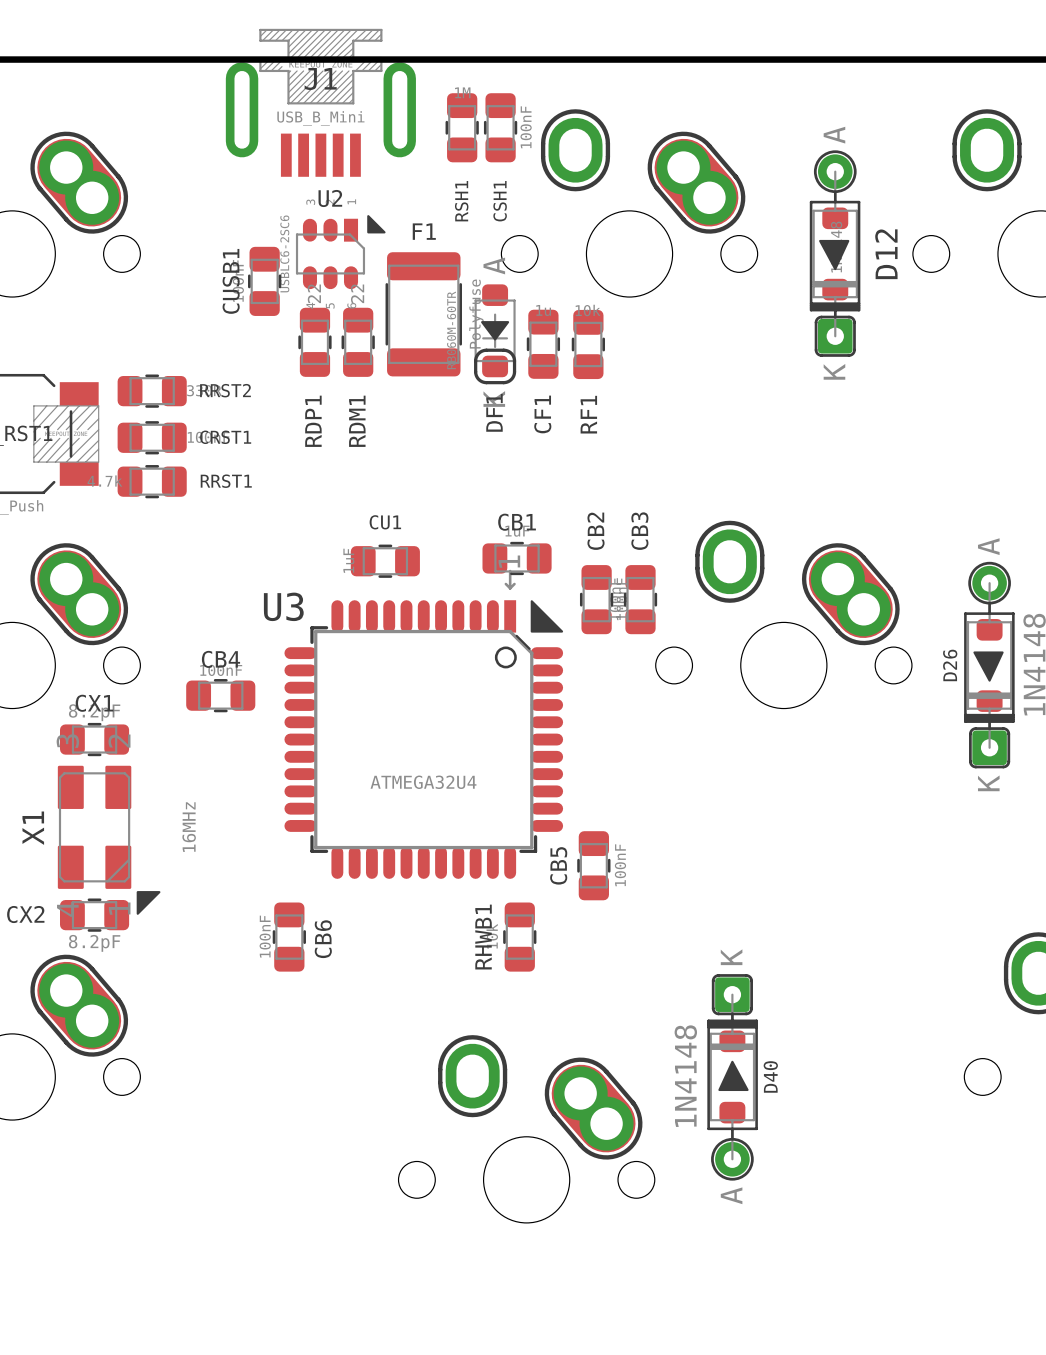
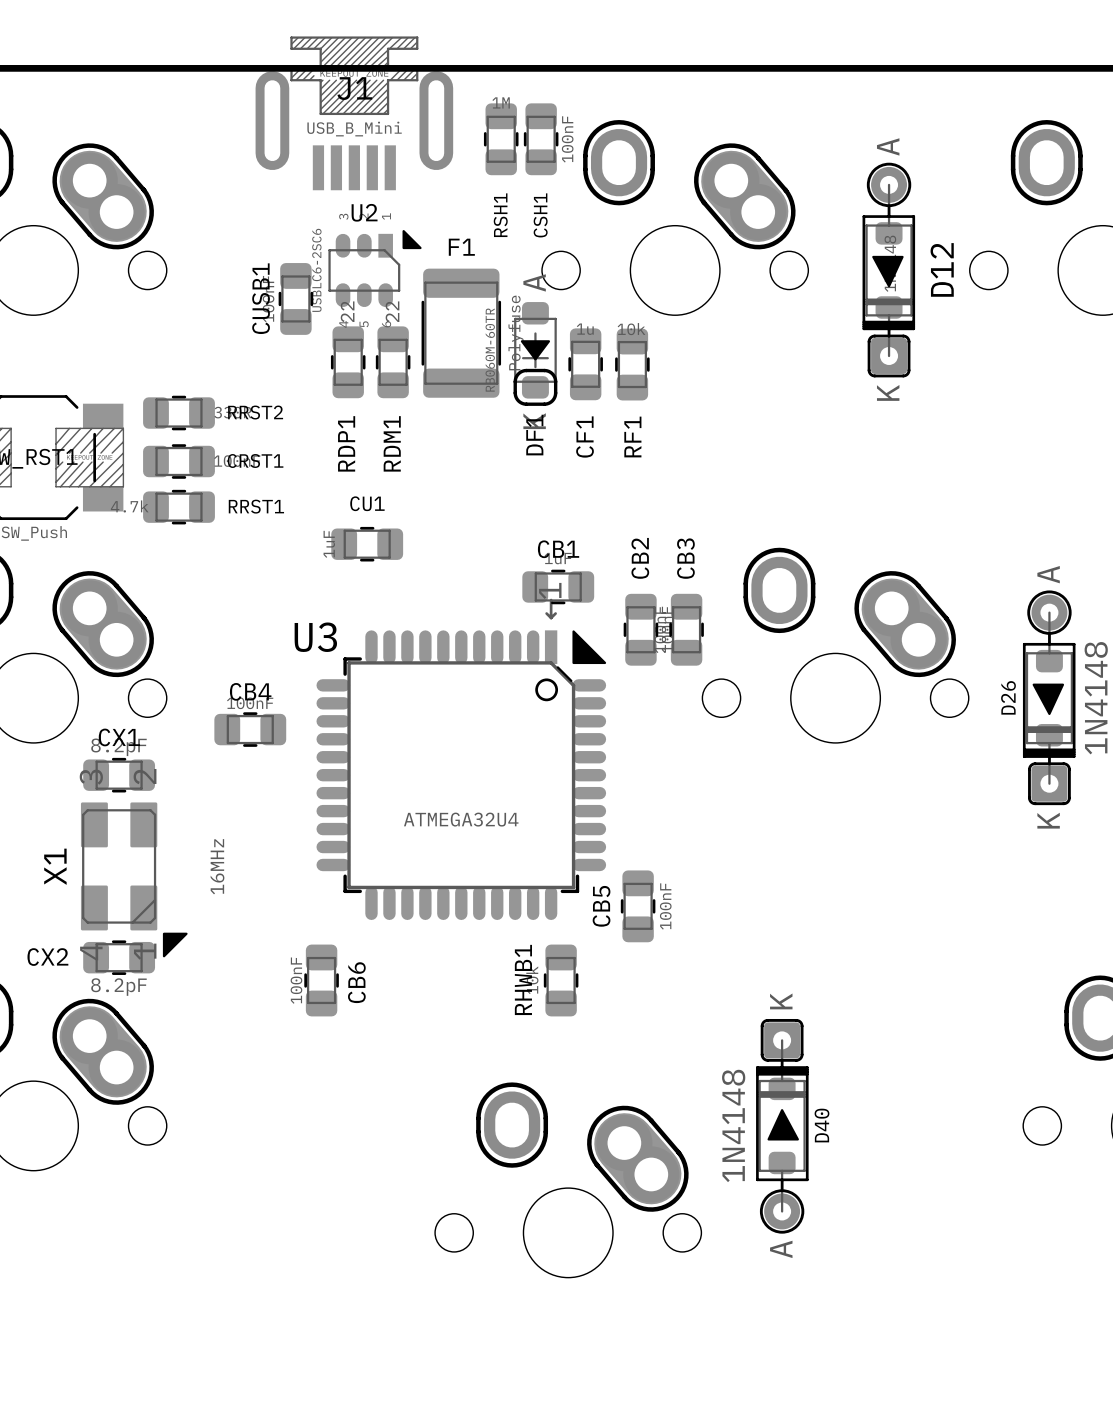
CU1 position: (385, 561) -> (367, 544)

